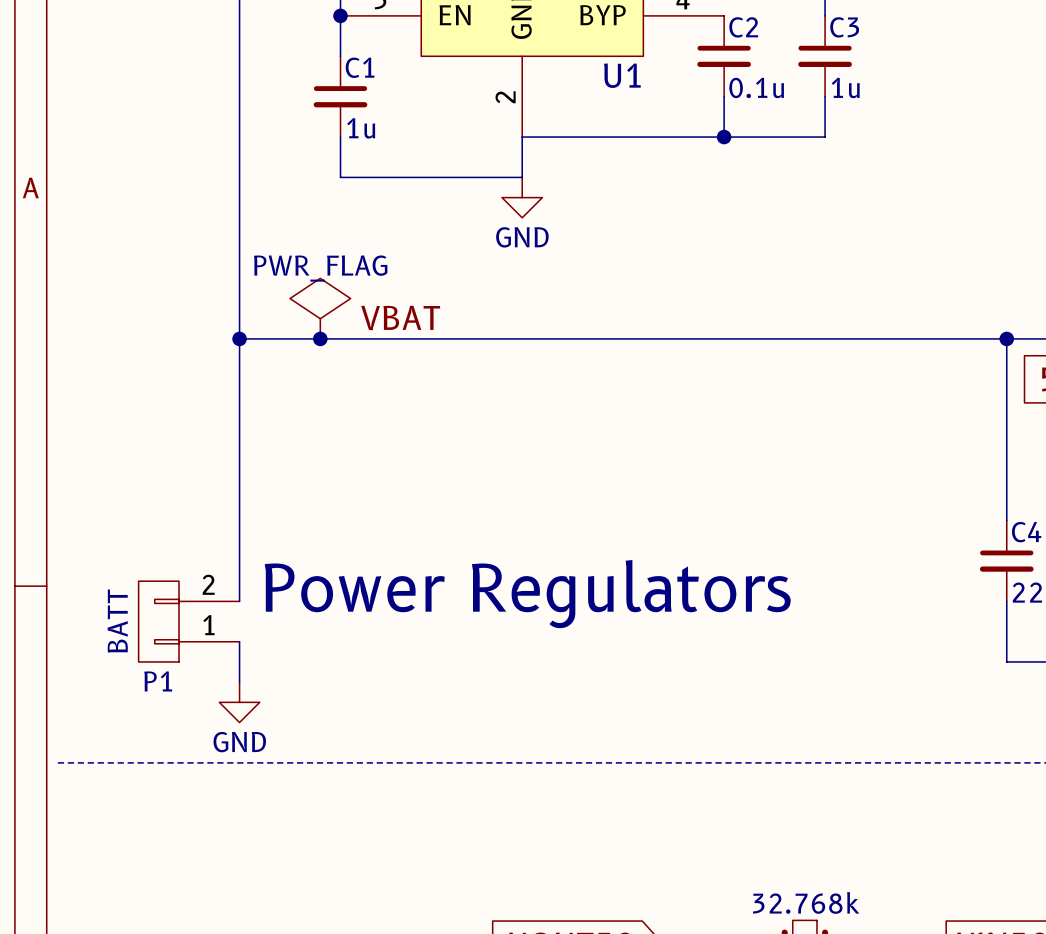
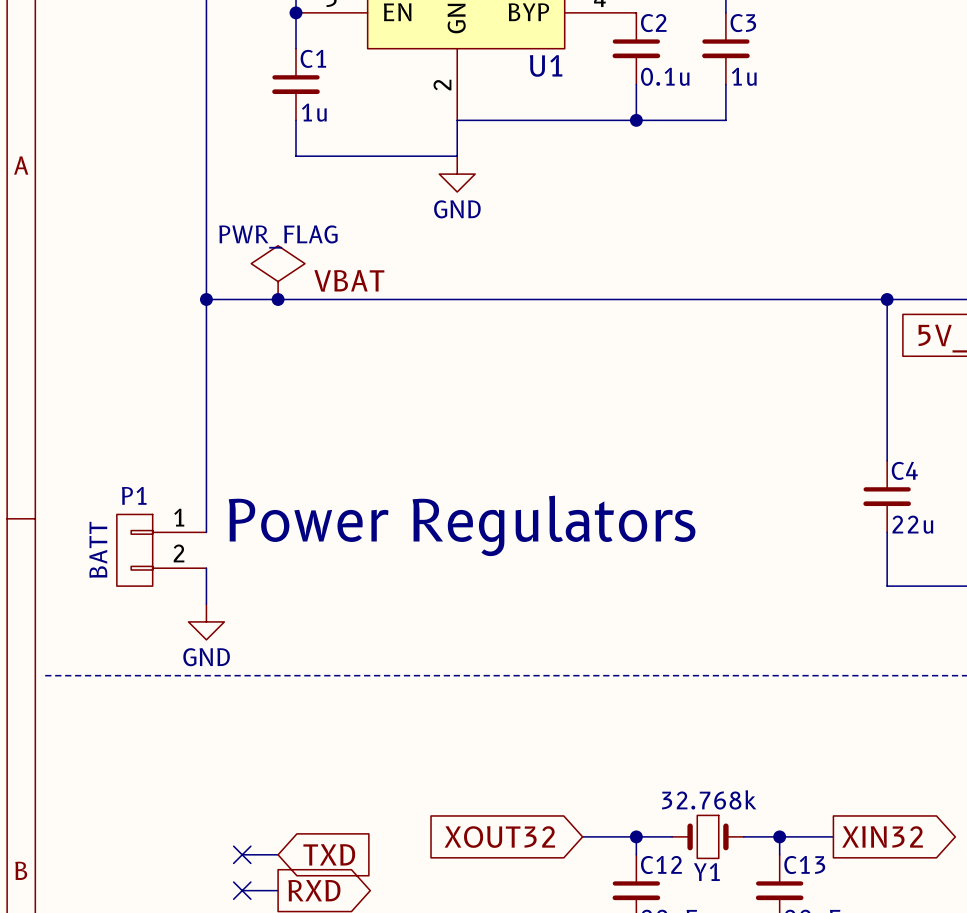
P1 flip: as is (158, 621) -> up-down (134, 550)

